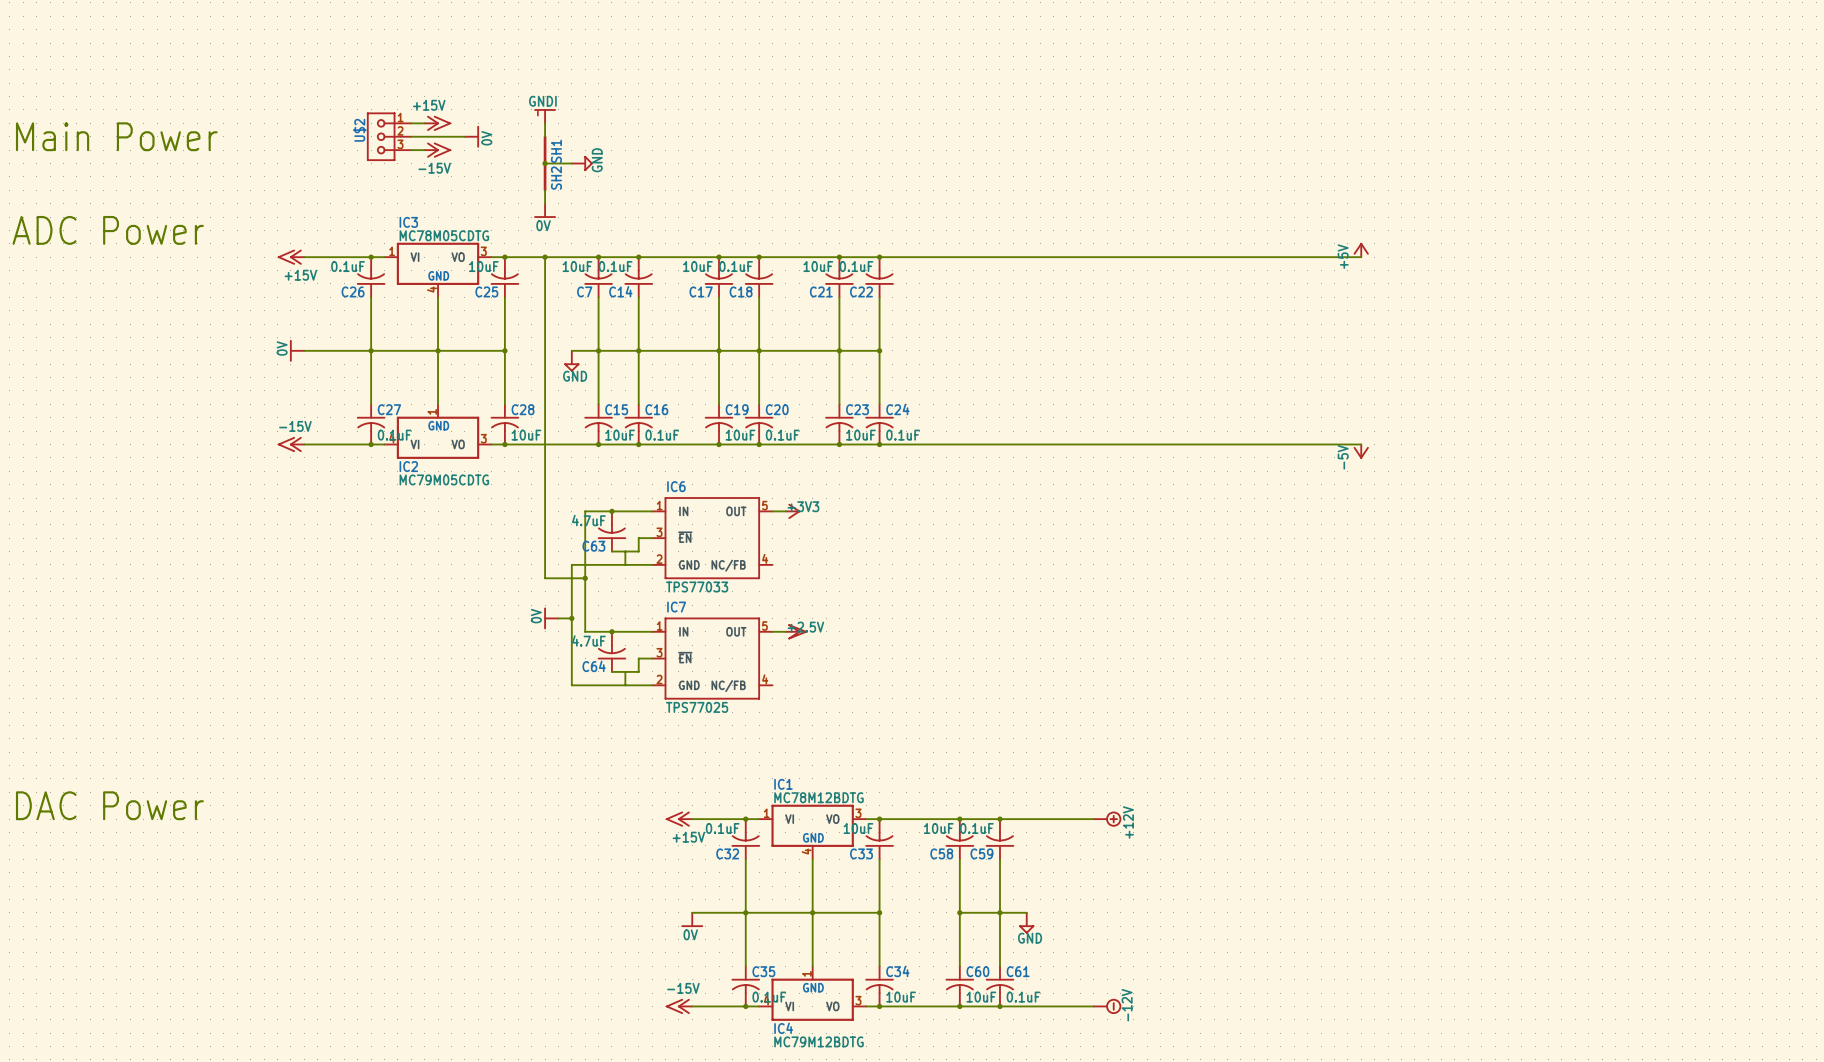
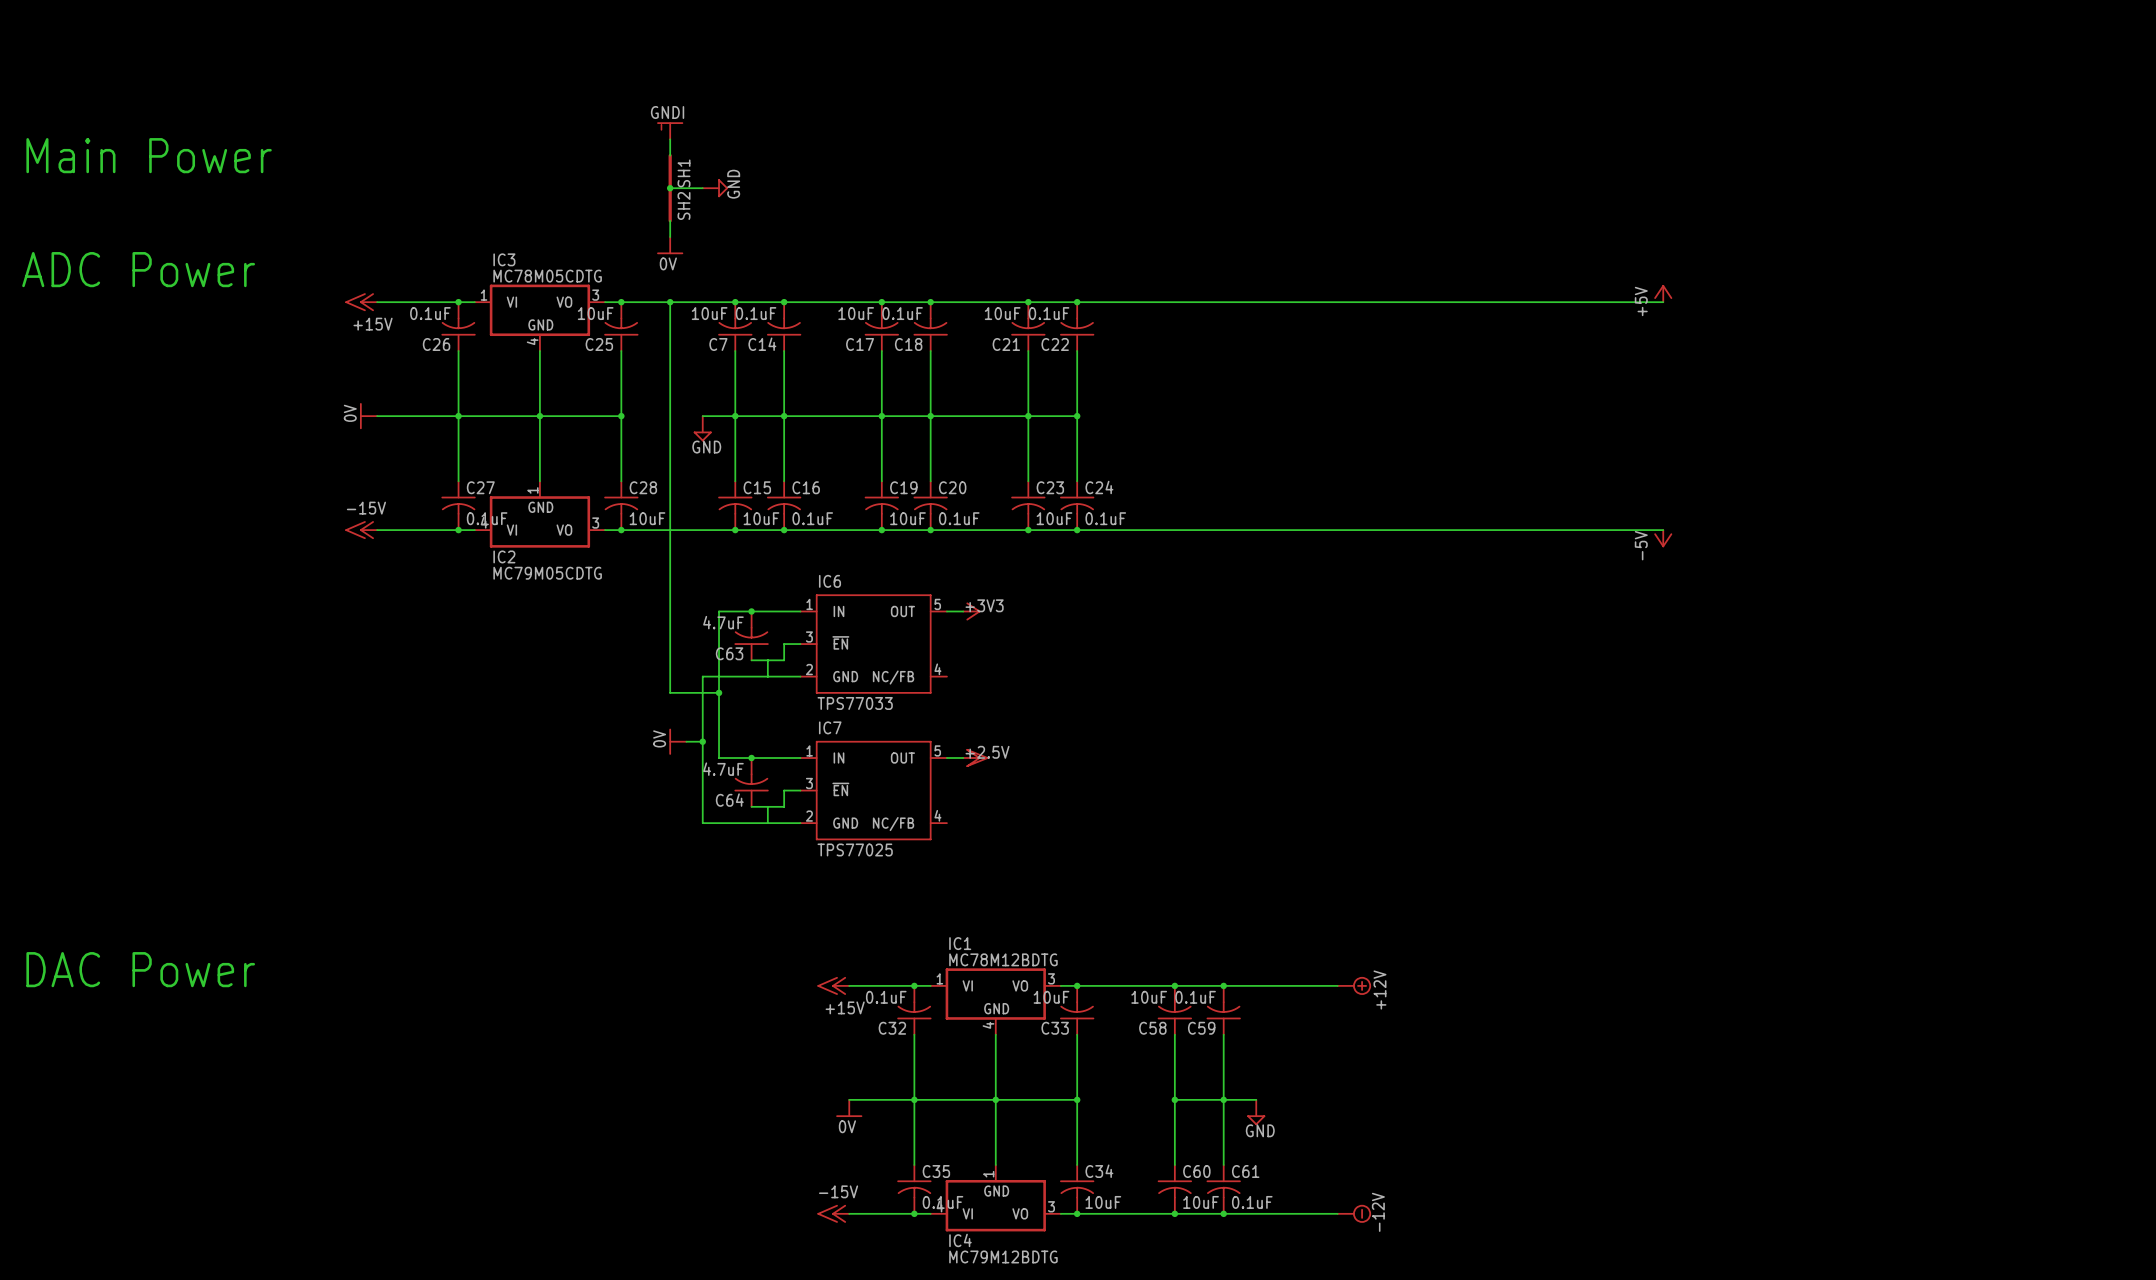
wire: (411, 123) (424, 123) -> none
power symbol: +15V (437, 123) -> none
U$2: (389, 136) -> none
wire: (411, 136) (464, 136) -> none
power symbol: 0V (471, 136) -> none
wire: (411, 150) (424, 150) -> none
power symbol: -15V (437, 150) -> none

